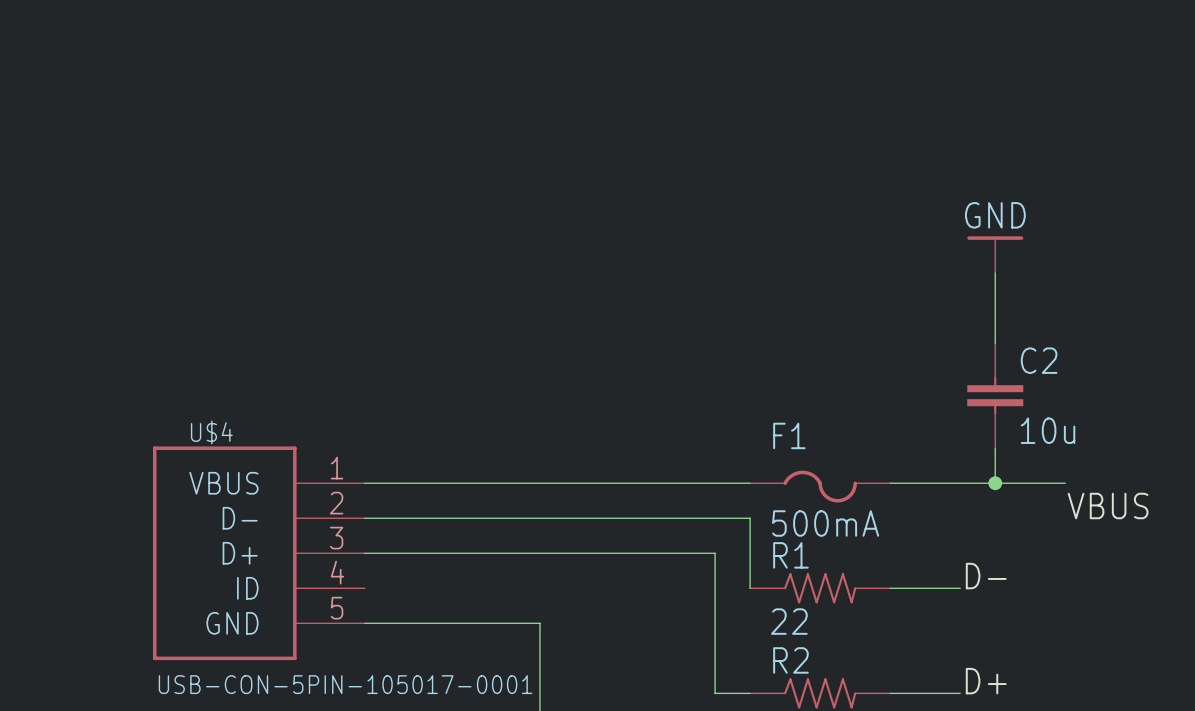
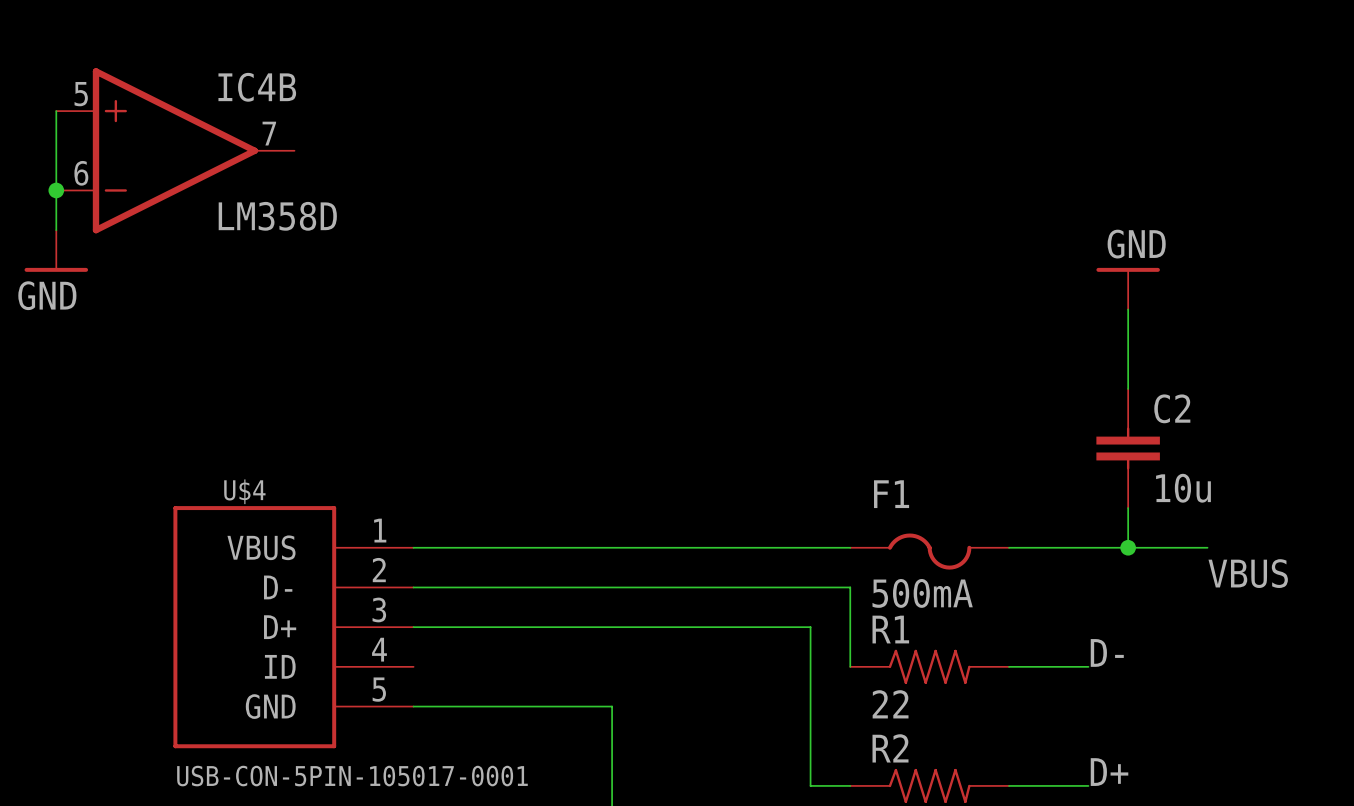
wire: none -> (56, 111) (56, 230)
IC4B: none -> LM358D (175, 150)
junction: none -> (56, 190)
power symbol: none -> GND (56, 251)

